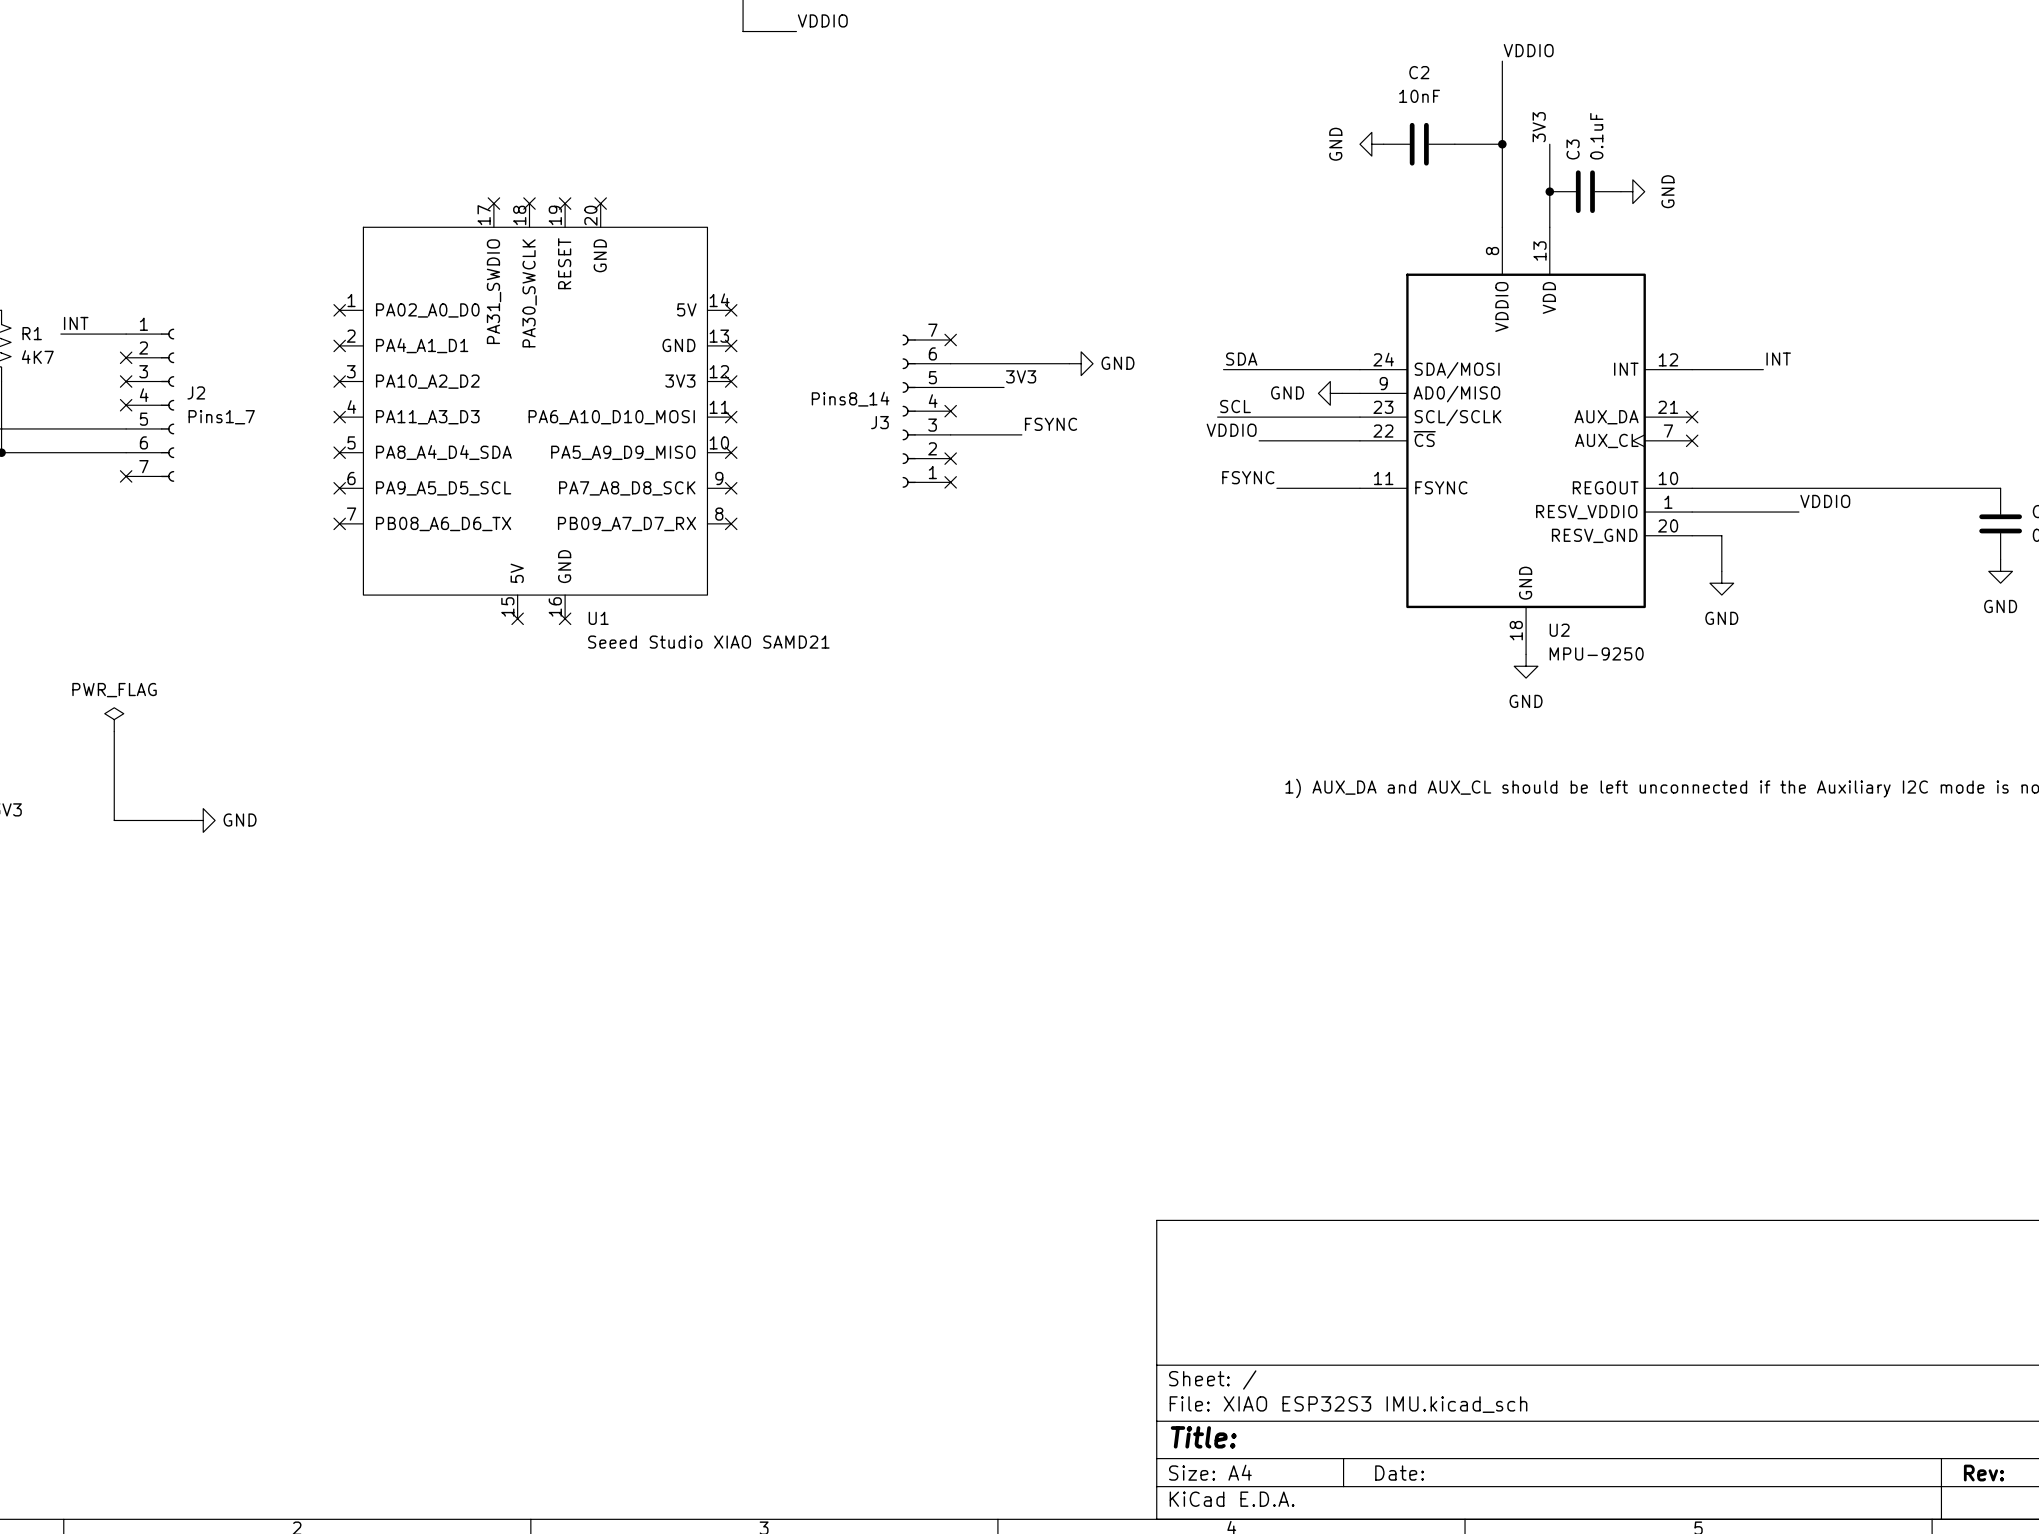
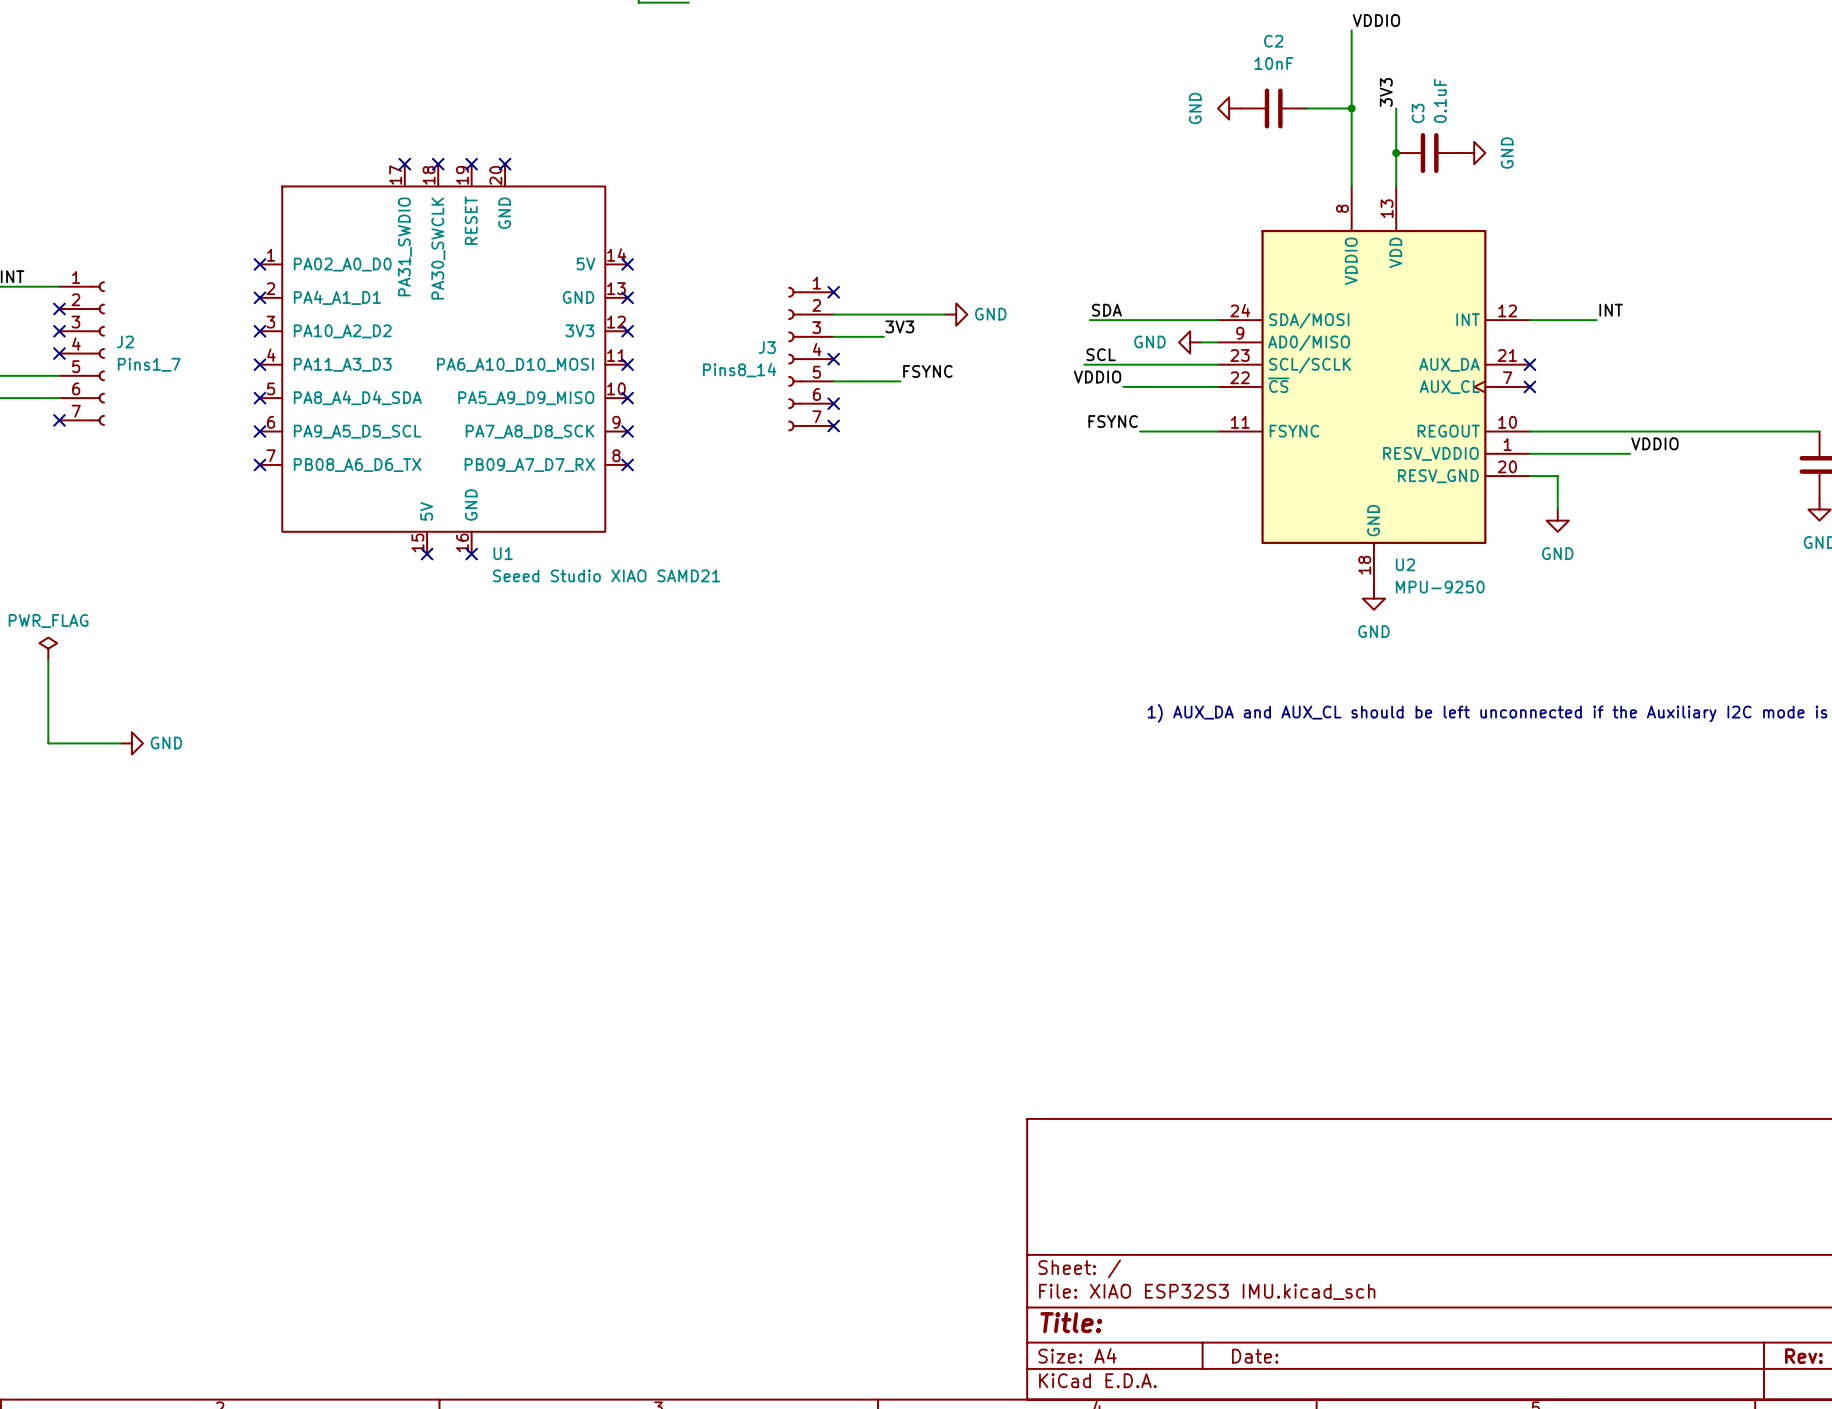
J3 flip: as is (909, 411) -> up-down (794, 359)

